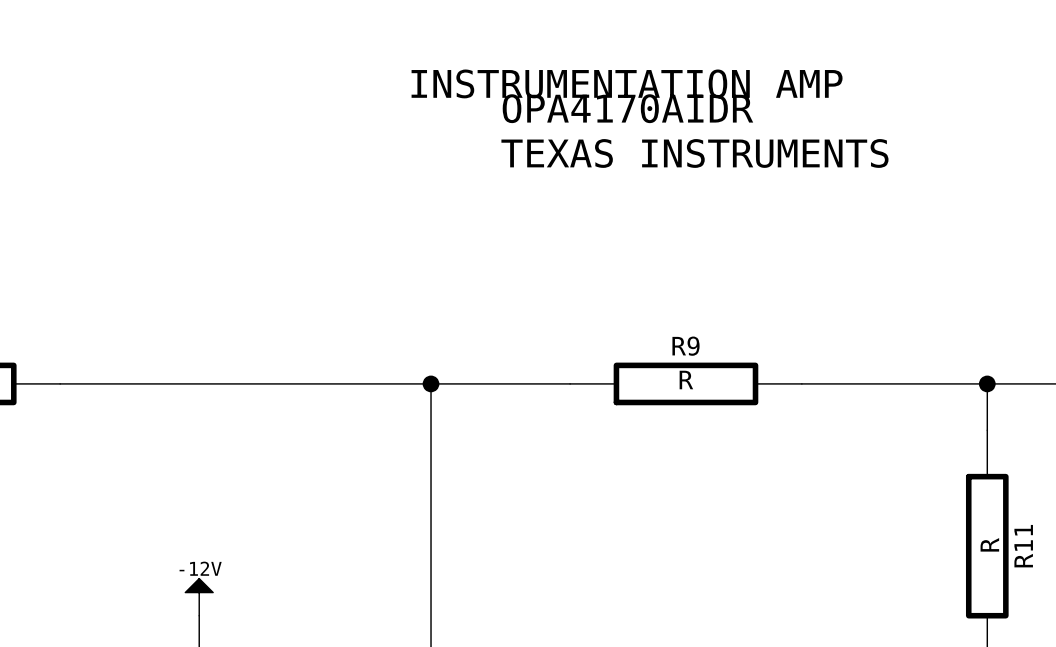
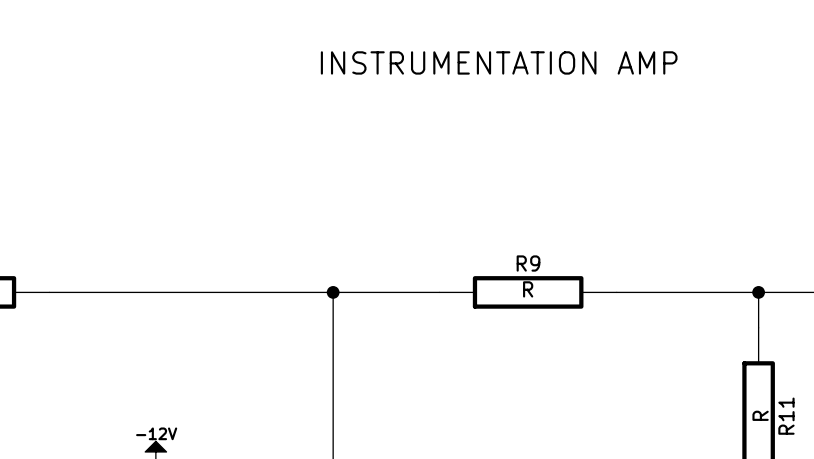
text: OPA4170AIDR (627, 108) -> none
text: TEXAS INSTRUMENTS (694, 153) -> none

